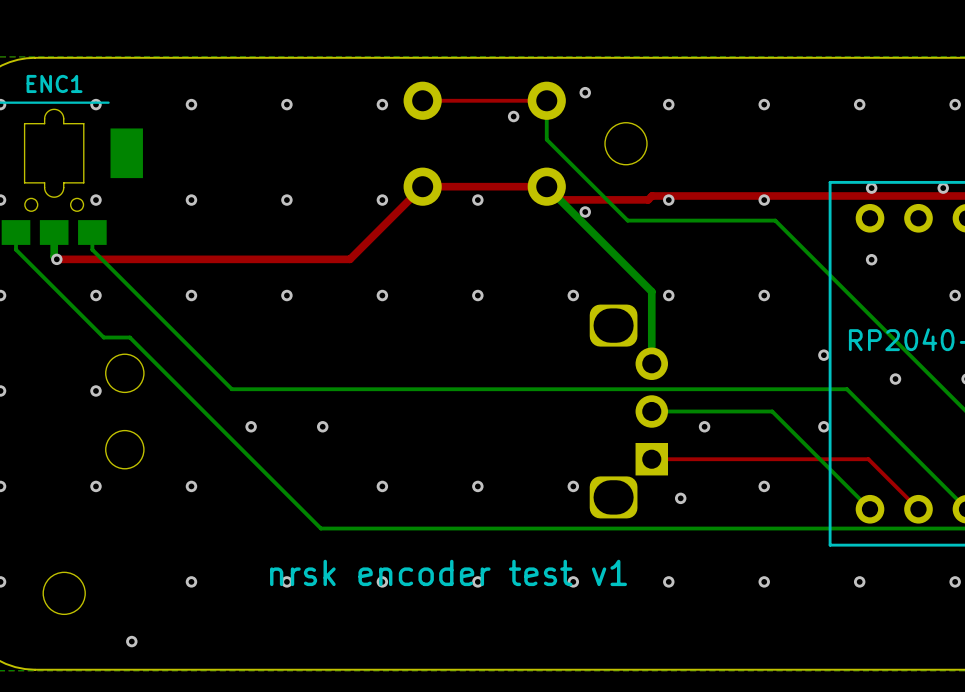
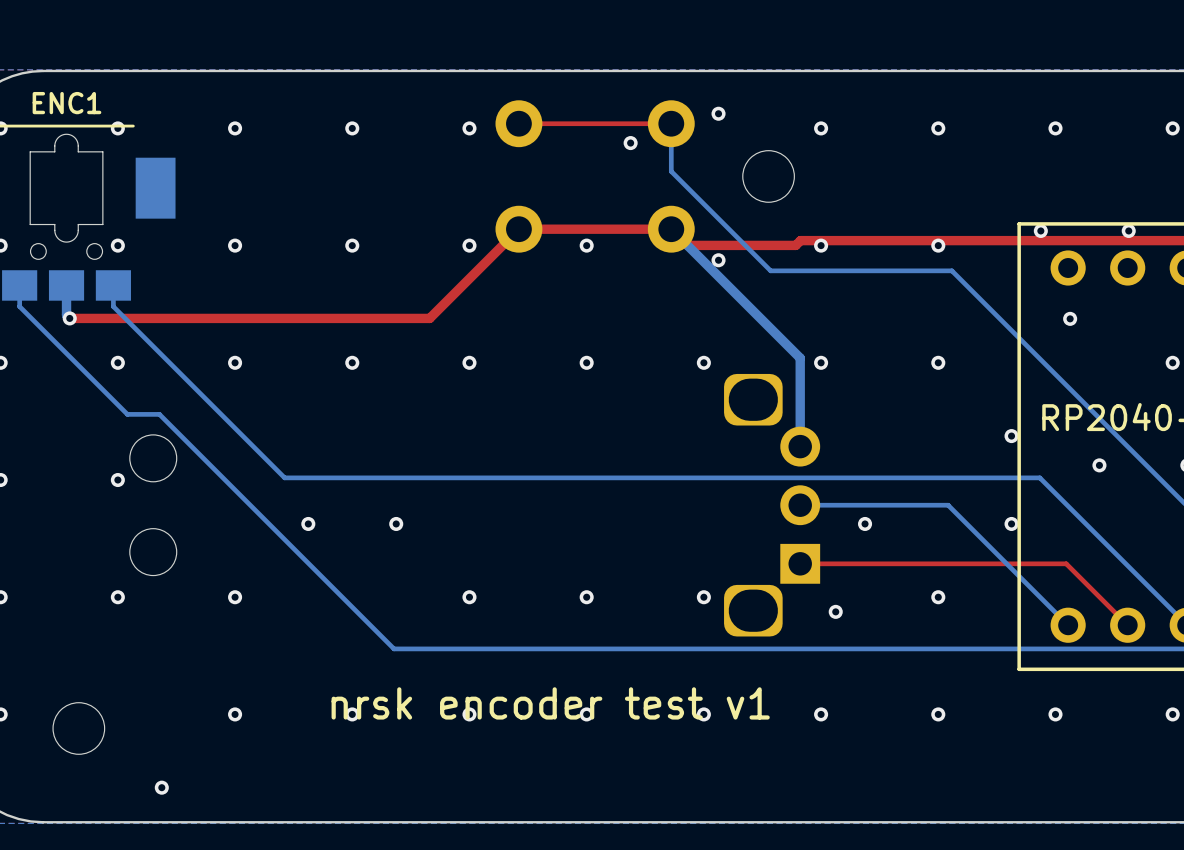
via: none -> (1040, 230)
via: (871, 188) -> none
via: none -> (1128, 230)
via: (943, 188) -> none

